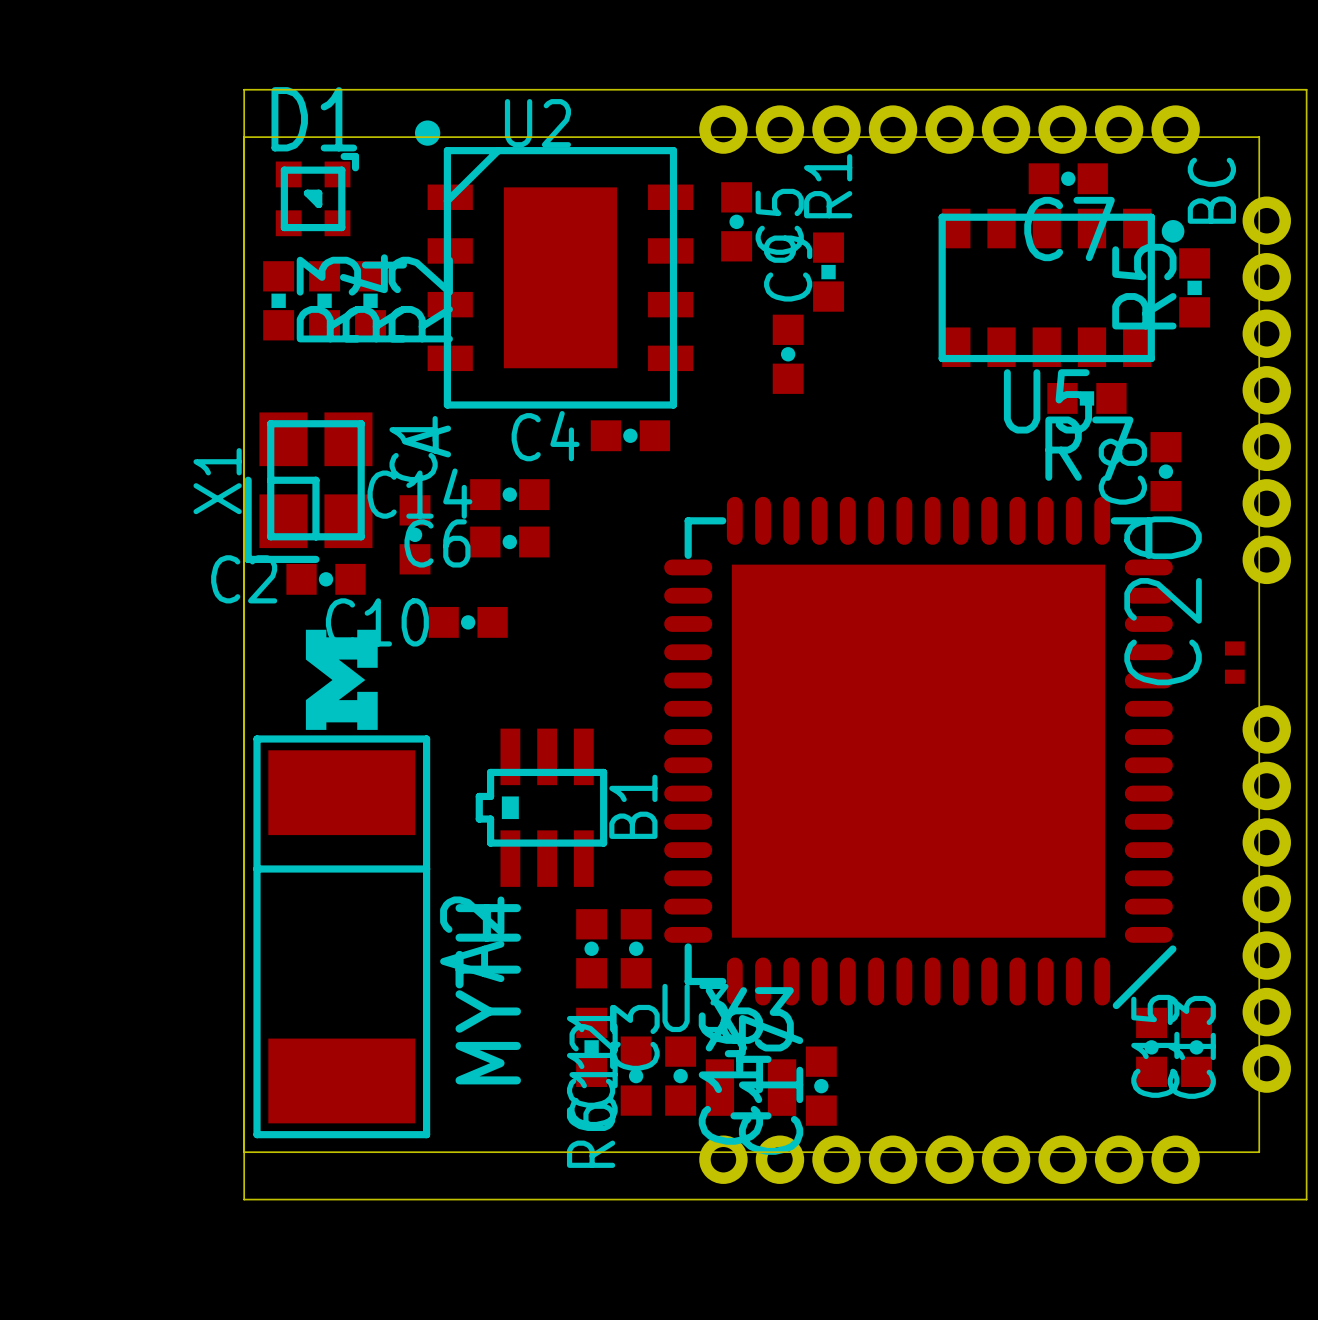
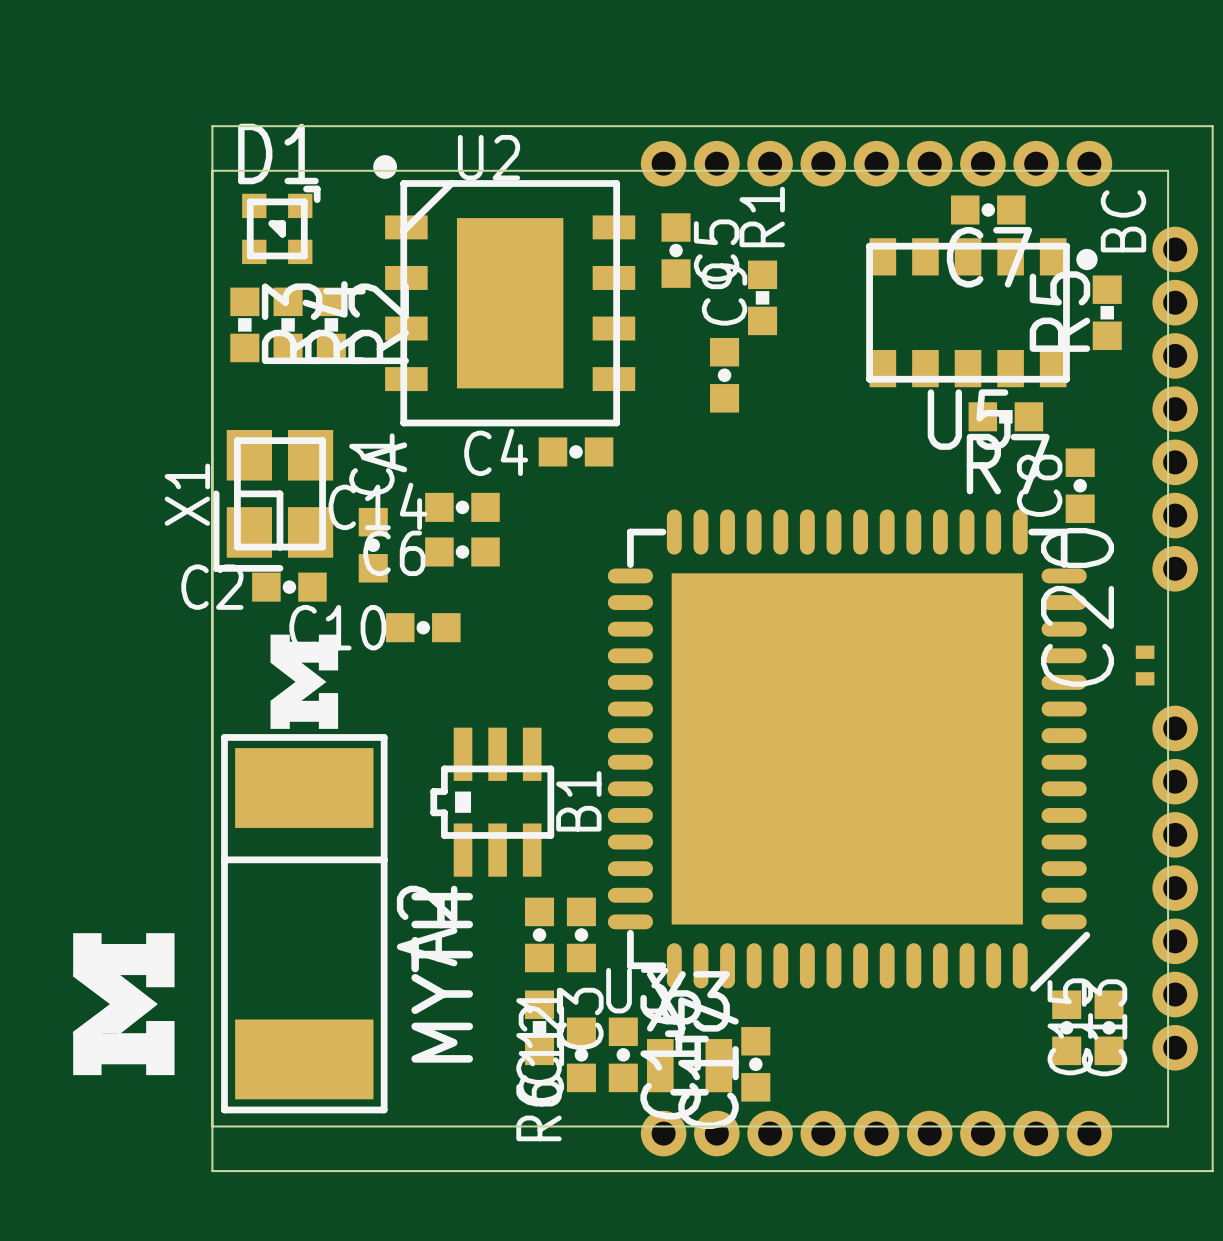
drawing: none -> [73, 933, 175, 1076]

